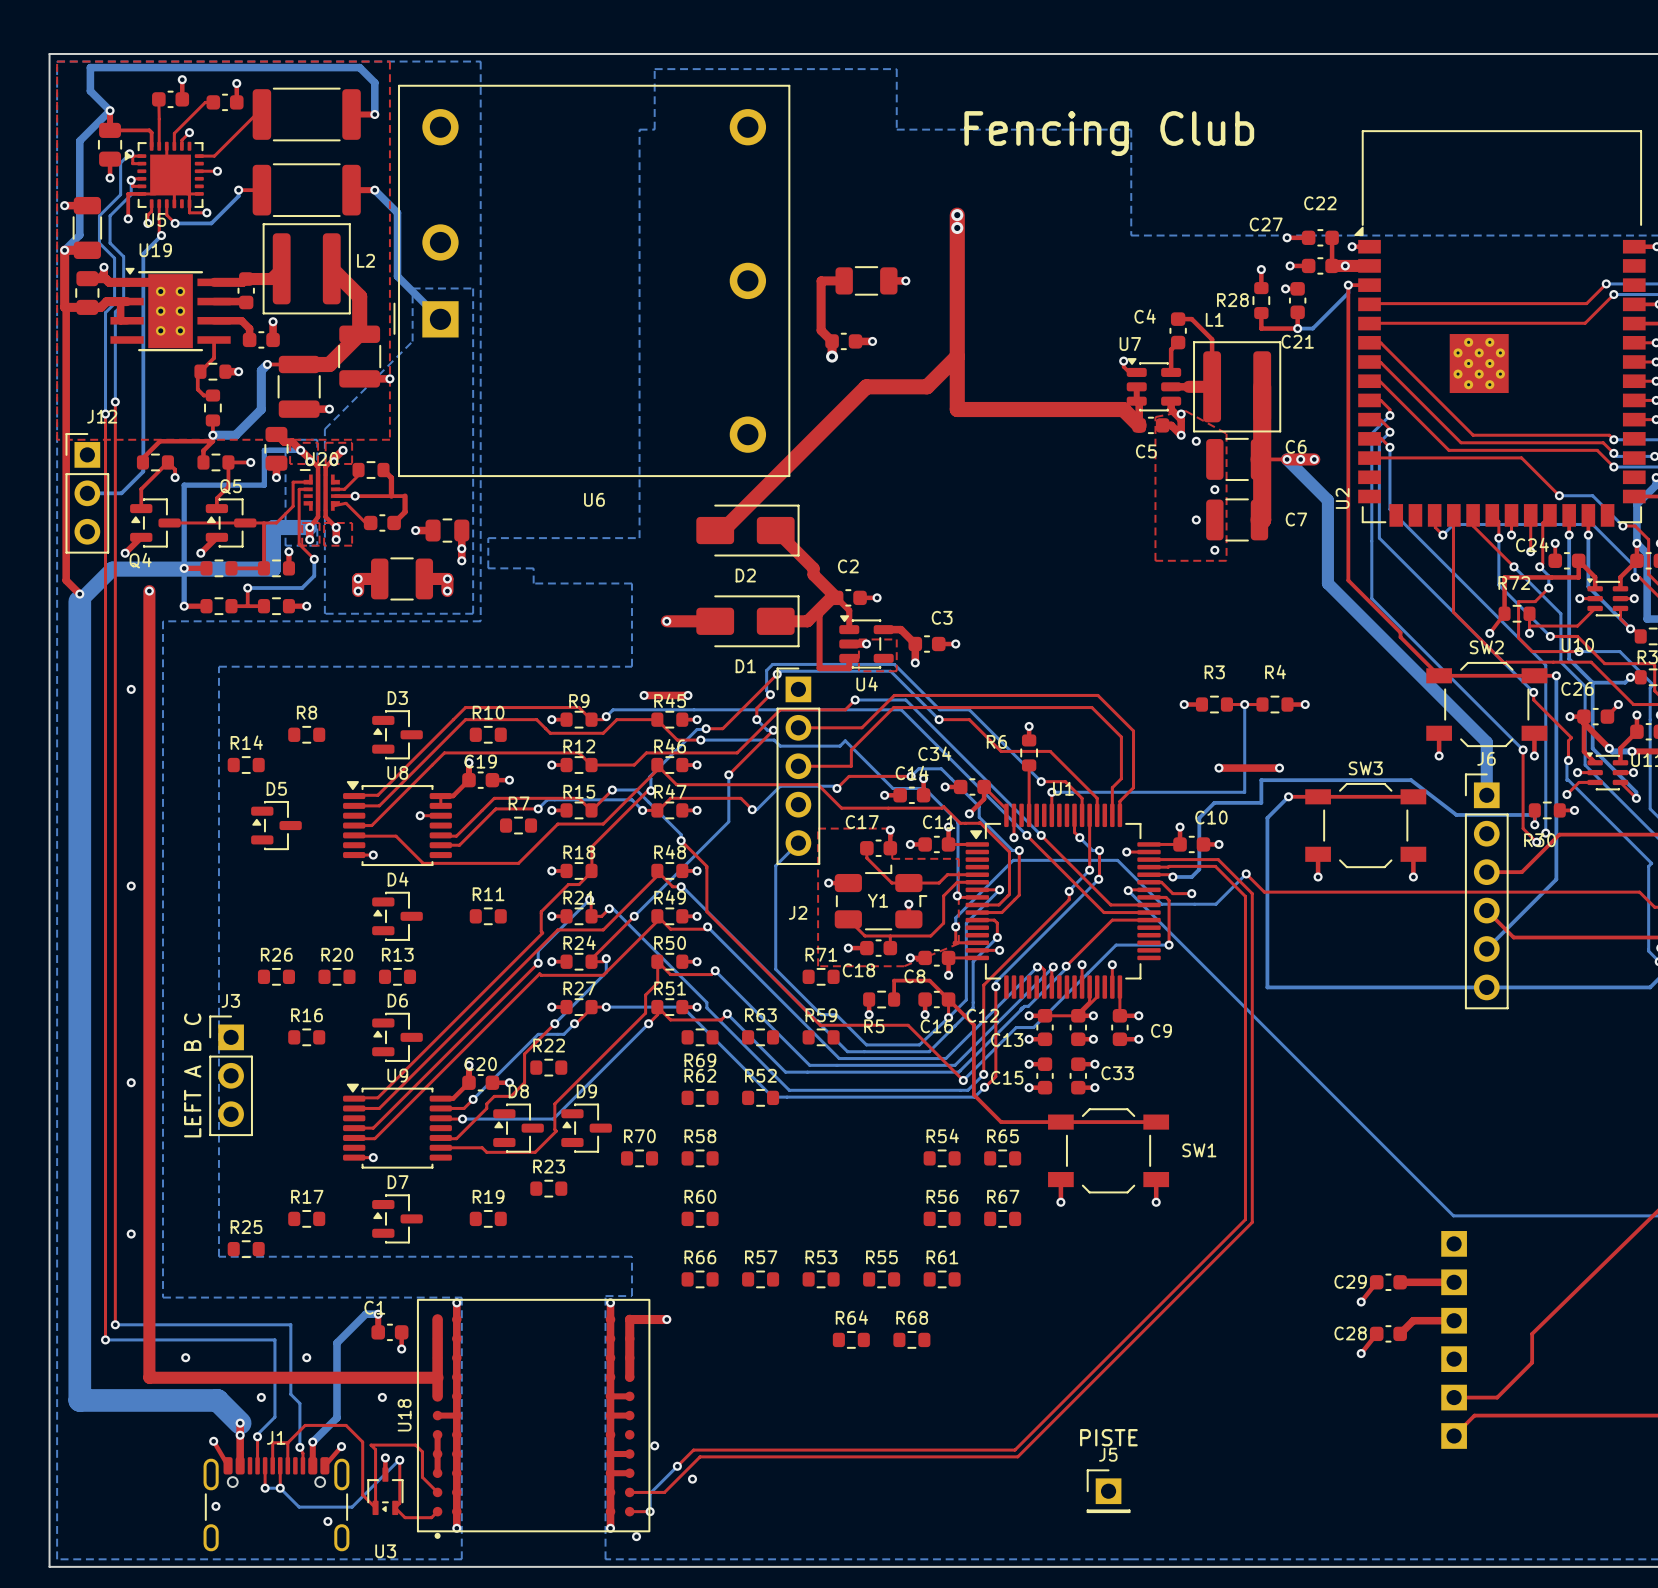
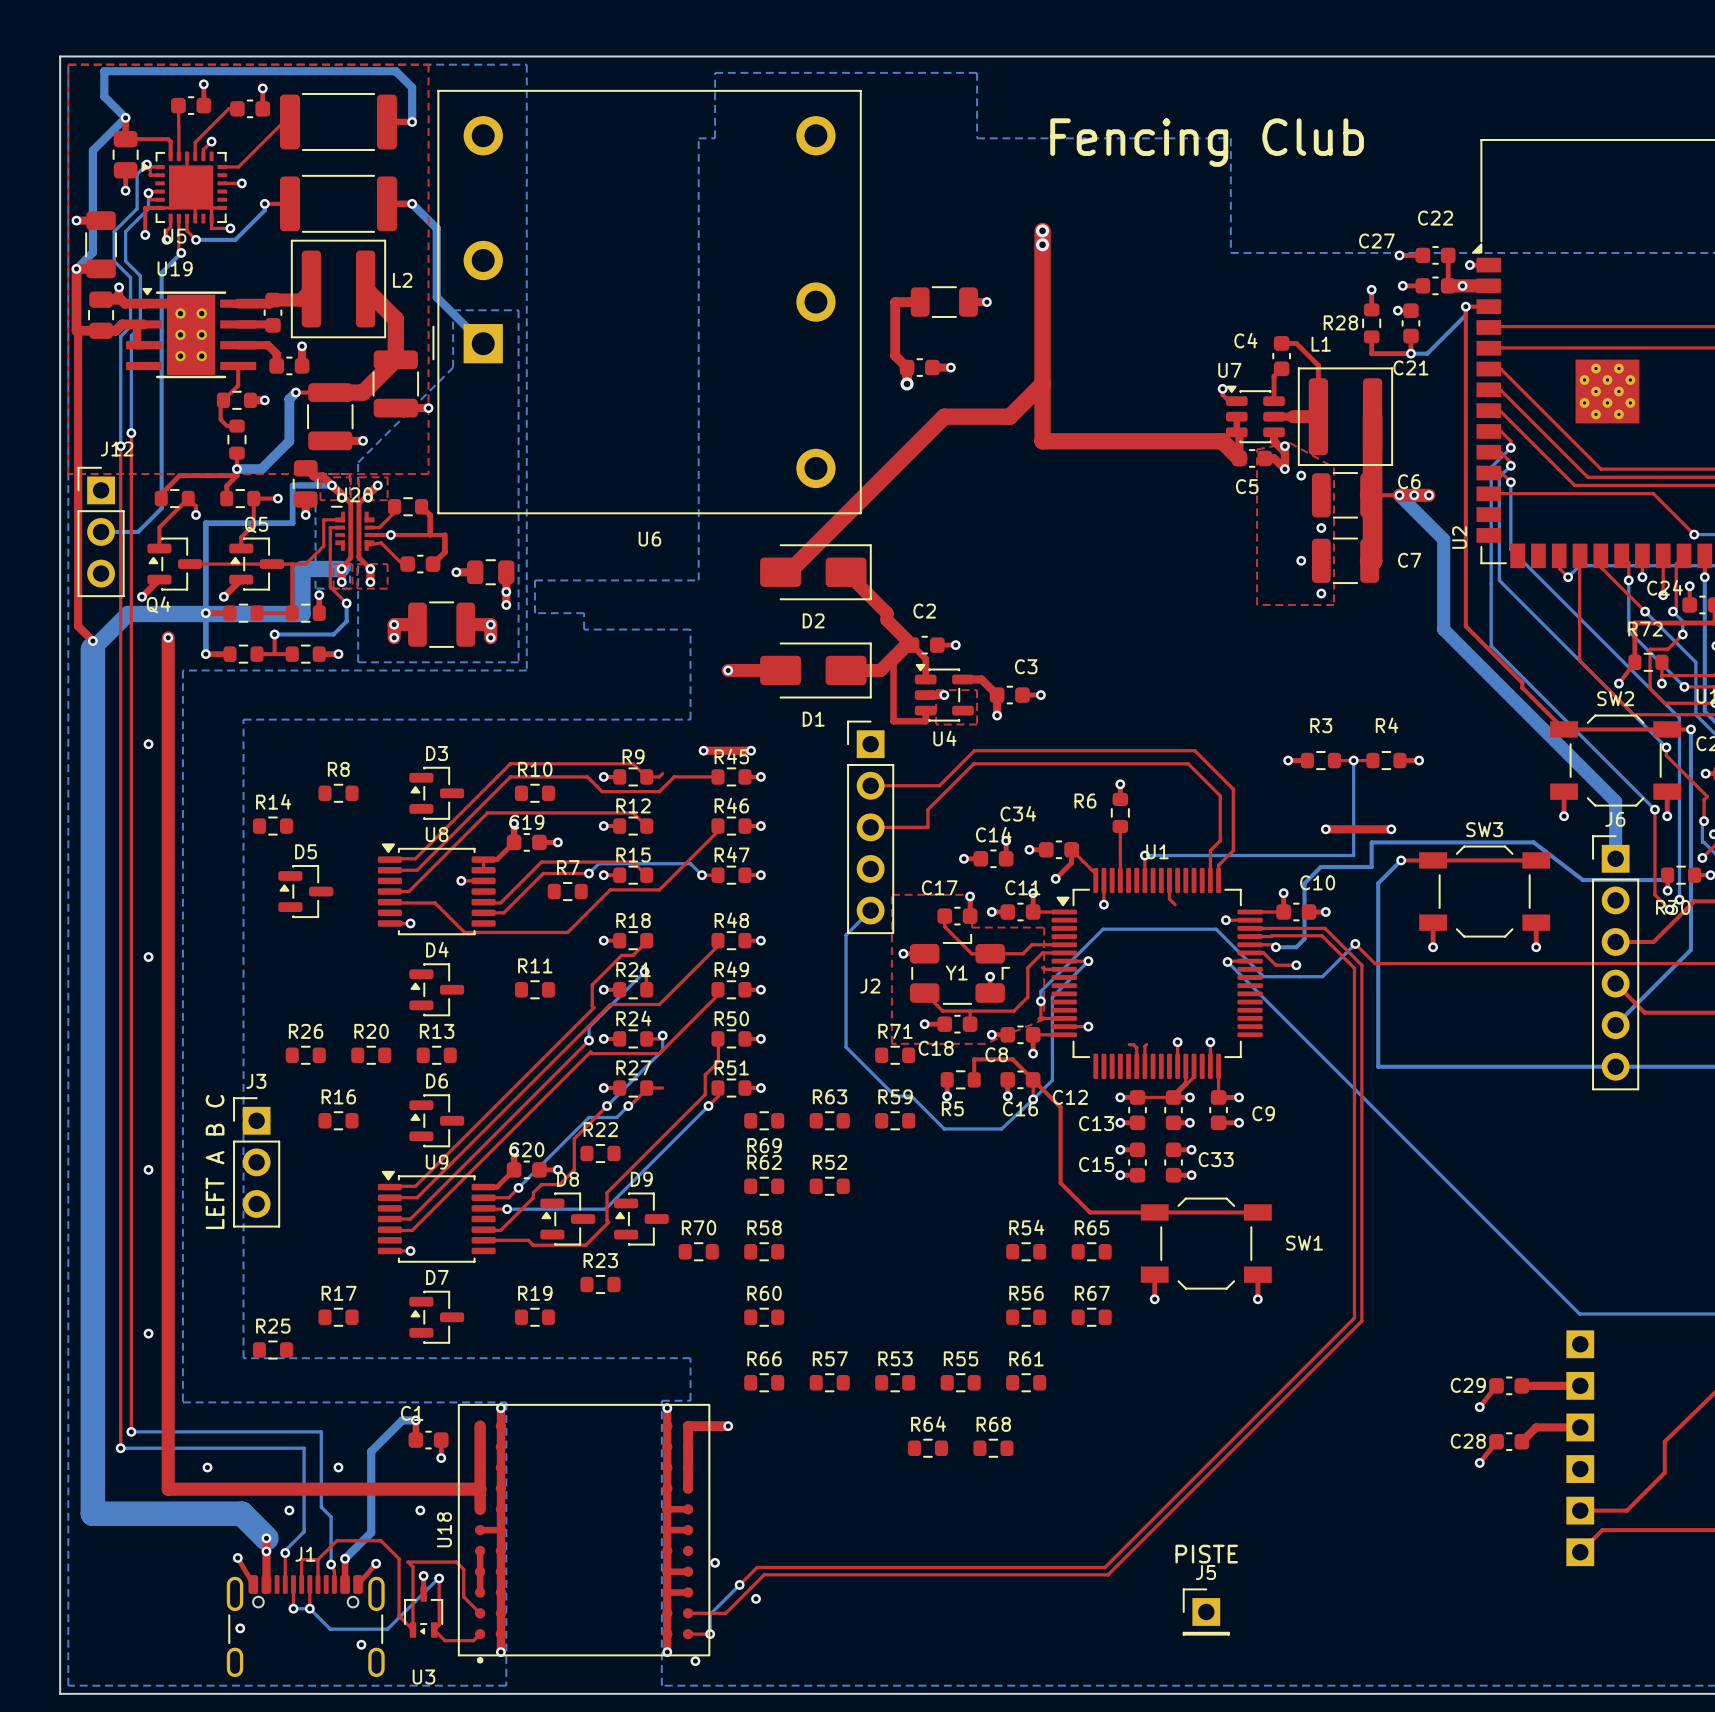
top track: (777, 674) (722, 728) (706, 728) -> none
bottom track: (777, 674) (780, 671) (890, 671) (939, 719) -> none
via: (777, 674) -> none
top track: (770, 694) (756, 708) (756, 719) -> none
bottom track: (770, 694) (766, 690) (766, 670) (772, 664) (894, 664) (939, 709) (969, 709) (1041, 781) -> none
via: (770, 694) -> none
top track: (855, 699) (845, 709) (780, 709) (737, 752) (646, 752) (634, 765) (591, 765) -> none
bottom track: (855, 699) (905, 699) (1041, 835) -> none
via: (855, 699) -> none
bottom track: (606, 716) (613, 709) (901, 709) (1026, 835) -> none
via: (606, 716) -> none
top track: (656, 719) (677, 740) (700, 740) -> none
bottom track: (756, 719) (767, 730) (773, 730) -> none
via: (756, 719) -> none
top track: (939, 719) (969, 719) (1001, 751) (1050, 751) (1097, 798) (1097, 815) -> none
via: (939, 719) -> none
bottom track: (706, 728) (697, 729) (649, 777) (650, 790) -> none
via: (706, 728) -> none
top track: (773, 730) (728, 774) -> none
via: (773, 730) -> none
bottom track: (700, 740) (774, 740) (780, 746) (840, 746) (845, 740) (892, 788) (924, 788) (958, 821) (957, 895) -> none
via: (700, 740) -> none
top track: (657, 765) (676, 784) (818, 784) (841, 808) (943, 806) (960, 823) (979, 822) (1009, 852) (1009, 894) (998, 904) (976, 904) -> none
bottom track: (728, 774) (728, 821) (634, 916) -> none
via: (728, 774) -> none
top track: (911, 776) (849, 776) (836, 788) -> none
bottom track: (911, 776) (918, 768) (941, 768) (979, 806) (979, 817) (1012, 850) (1019, 850) -> none
via: (911, 776) -> none
top track: (1041, 781) (1065, 781) (1082, 798) (1082, 815) -> none
via: (1041, 781) -> none
bottom track: (836, 788) (834, 786) (780, 786) (756, 809) (752, 809) -> none
via: (836, 788) -> none
top track: (612, 790) (591, 810) -> none
bottom track: (612, 790) (636, 790) (681, 834) (681, 840) -> none
via: (612, 790) -> none
top track: (650, 790) (647, 790) (591, 846) (591, 870) -> none
via: (650, 790) -> none
top track: (752, 809) (740, 798) (670, 798) (657, 810) -> none
via: (752, 809) -> none
top track: (1089, 815) (1089, 870) -> none
top track: (1026, 835) (1104, 912) (1149, 912) -> none
via: (1026, 835) -> none
top track: (1041, 835) (1110, 904) (1149, 904) -> none
via: (1041, 835) -> none
bottom track: (1079, 837) (1092, 850) (1099, 850) -> none
via: (1079, 837) -> none
top track: (681, 840) (706, 866) (706, 911) (820, 1025) (908, 1025) (963, 1080) -> none
via: (681, 840) -> none
top track: (1019, 850) (1019, 895) (1001, 912) (976, 912) -> none
via: (1019, 850) -> none
top track: (1099, 850) (1098, 879) -> none
via: (1099, 850) -> none
top track: (657, 870) (672, 886) (681, 886) -> none
bottom track: (1089, 870) (1069, 891) -> none
via: (1089, 870) -> none
bottom track: (1098, 879) (995, 982) (995, 986) -> none
via: (1098, 879) -> none
bottom track: (681, 886) (847, 1051) (929, 1051) (973, 1007) (973, 961) (997, 937) -> none
via: (681, 886) -> none
top track: (1069, 891) (1069, 899) (983, 985) (983, 1074) -> none
via: (1069, 891) -> none
via: (957, 895) -> none
top track: (1148, 897) (1166, 897) (1169, 900) (1169, 945) -> none
top track: (609, 908) (601, 916) (591, 916) -> none
bottom track: (609, 908) (613, 908) (706, 1002) (706, 1007) (789, 1090) (967, 1090) (983, 1074) -> none
via: (609, 908) -> none
top track: (634, 916) (591, 958) (591, 961) -> none
via: (634, 916) -> none
top track: (657, 916) (670, 929) (705, 929) (707, 926) -> none
top track: (976, 920) (994, 920) (997, 923) (997, 937) -> none
top track: (1149, 920) (1112, 920) (1066, 966) -> none
bottom track: (707, 926) (839, 1058) (945, 1058) (1037, 967) -> none
via: (707, 926) -> none
via: (997, 937) -> none
bottom track: (1169, 945) (1116, 945) (1033, 1027) (1016, 1027) (963, 1080) -> none
via: (1169, 945) -> none
top track: (657, 961) (670, 974) (711, 974) (715, 970) -> none
bottom track: (1066, 966) (1066, 968) (1028, 1006) (1022, 1007) (958, 1072) (785, 1072) (727, 1013) -> none
via: (1066, 966) -> none
via: (1037, 967) -> none
bottom track: (1053, 967) (955, 1065) (809, 1065) (715, 970) -> none
via: (1053, 967) -> none
via: (715, 970) -> none
top track: (995, 986) (995, 1076) (984, 1087) -> none
via: (995, 986) -> none
bottom track: (606, 1007) (682, 1007) (772, 1097) (974, 1097) (984, 1087) -> none
via: (606, 1007) -> none
top track: (657, 1007) (670, 1019) (721, 1019) (727, 1013) -> none
via: (727, 1013) -> none
via: (983, 1074) -> none
via: (963, 1080) -> none
via: (984, 1087) -> none

